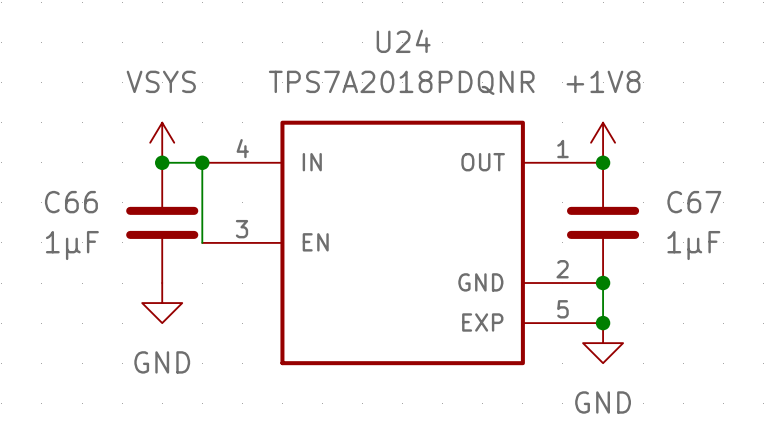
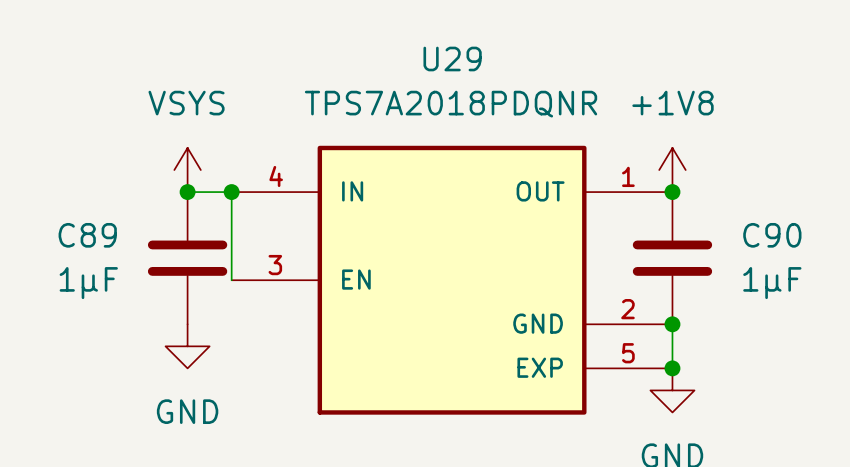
U24 name: U24 (403, 41) -> U29 (452, 58)
C66 name: C66 (71, 202) -> C89 (87, 235)
C67 name: C67 (694, 202) -> C90 (772, 235)

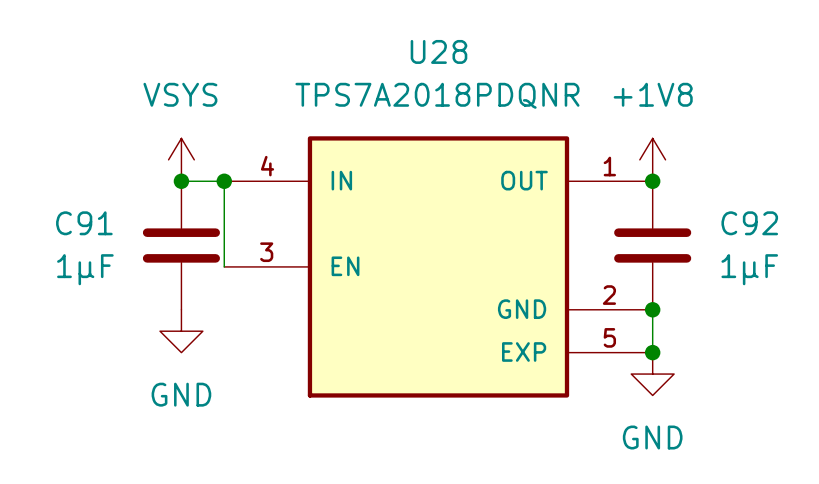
U29 name: U29 (452, 58) -> U28 (438, 51)
C89 name: C89 (87, 235) -> C91 (84, 223)
C90 name: C90 (772, 235) -> C92 (749, 223)

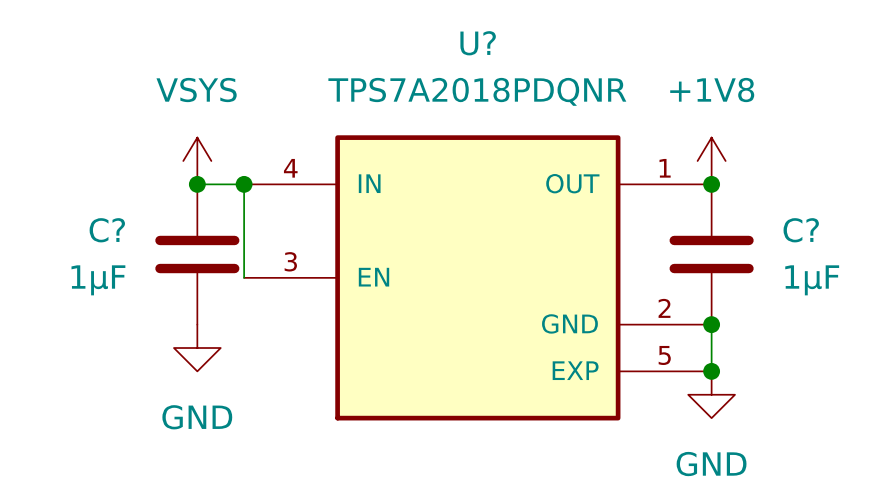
U28 name: U28 (438, 51) -> U? (478, 43)
C91 name: C91 (84, 223) -> C? (107, 230)
C92 name: C92 (749, 223) -> C? (801, 230)

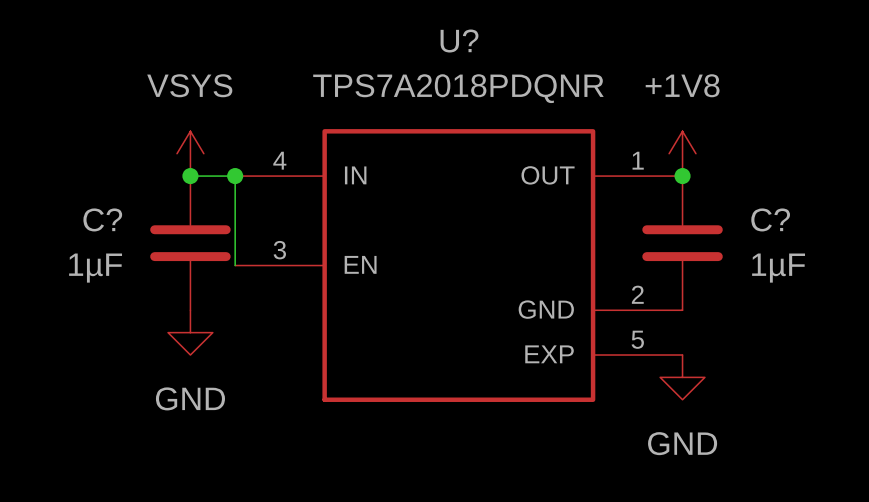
wire: (711, 324) (711, 371) -> none
junction: (711, 324) -> none
junction: (711, 371) -> none

